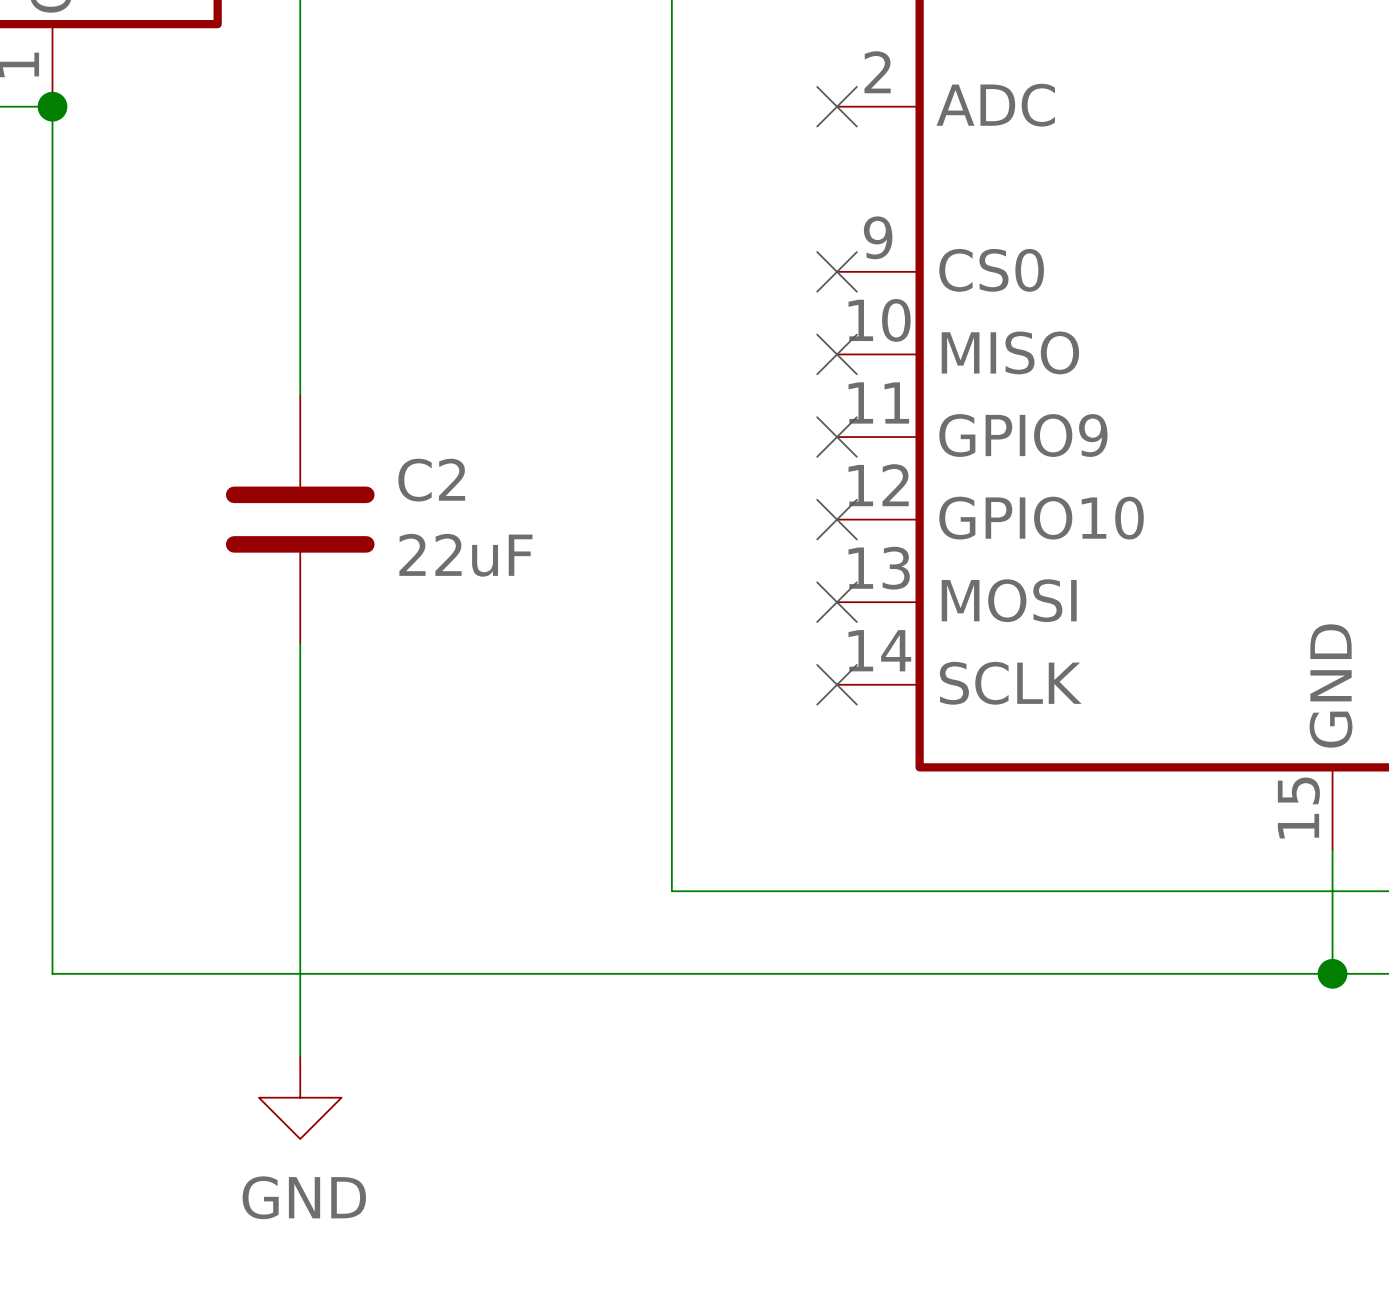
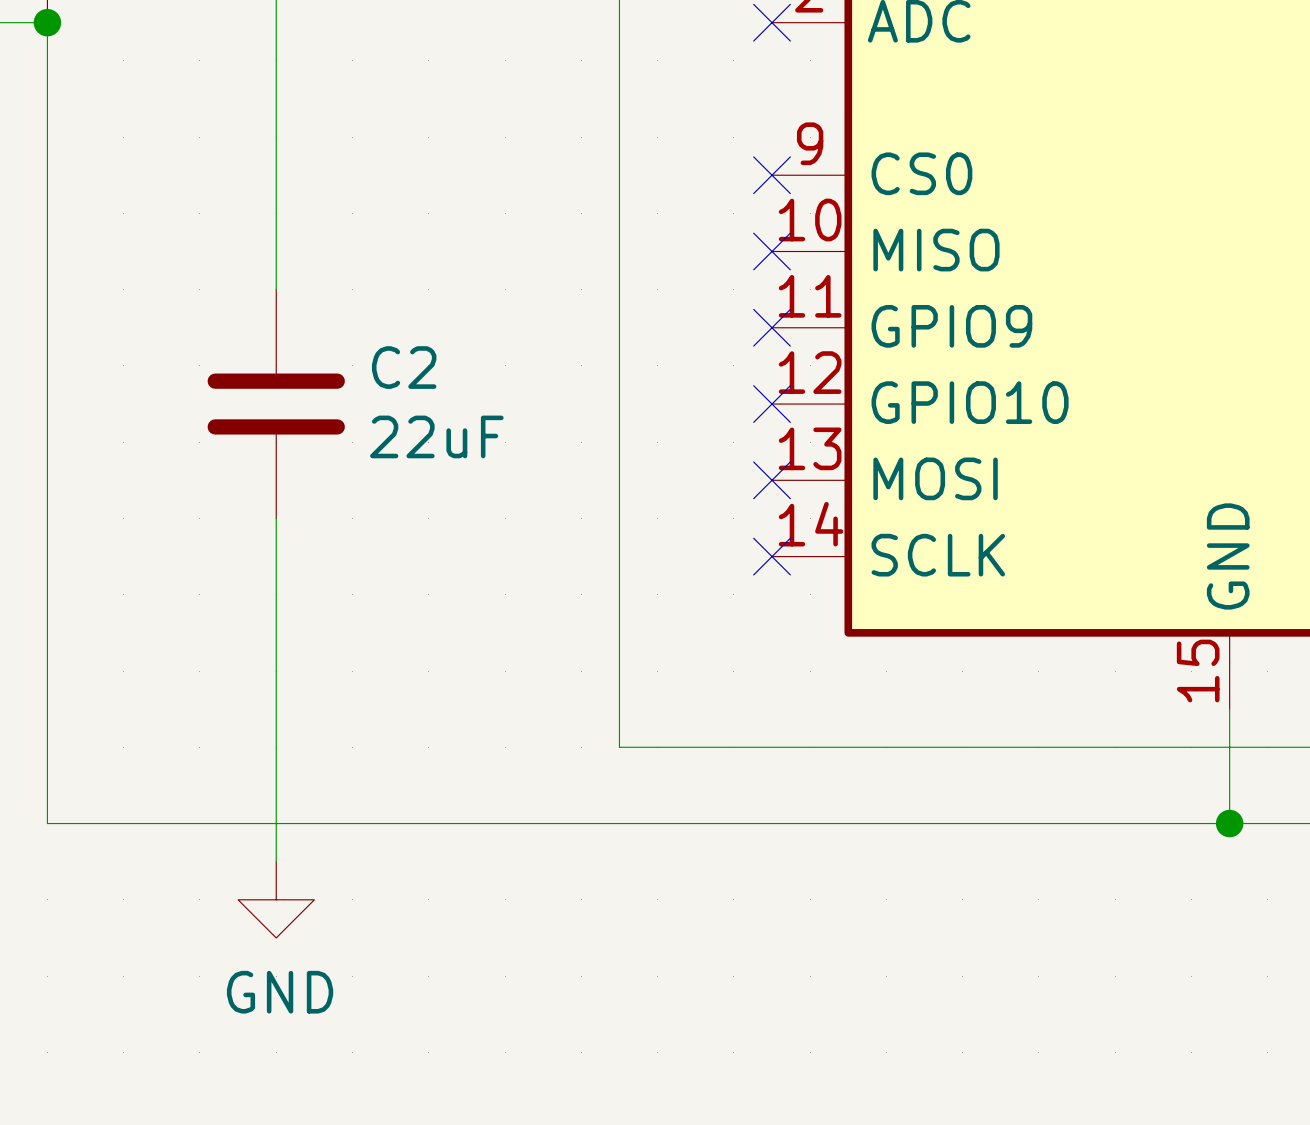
power symbol position: GND (300, 1097) -> GND (276, 899)

